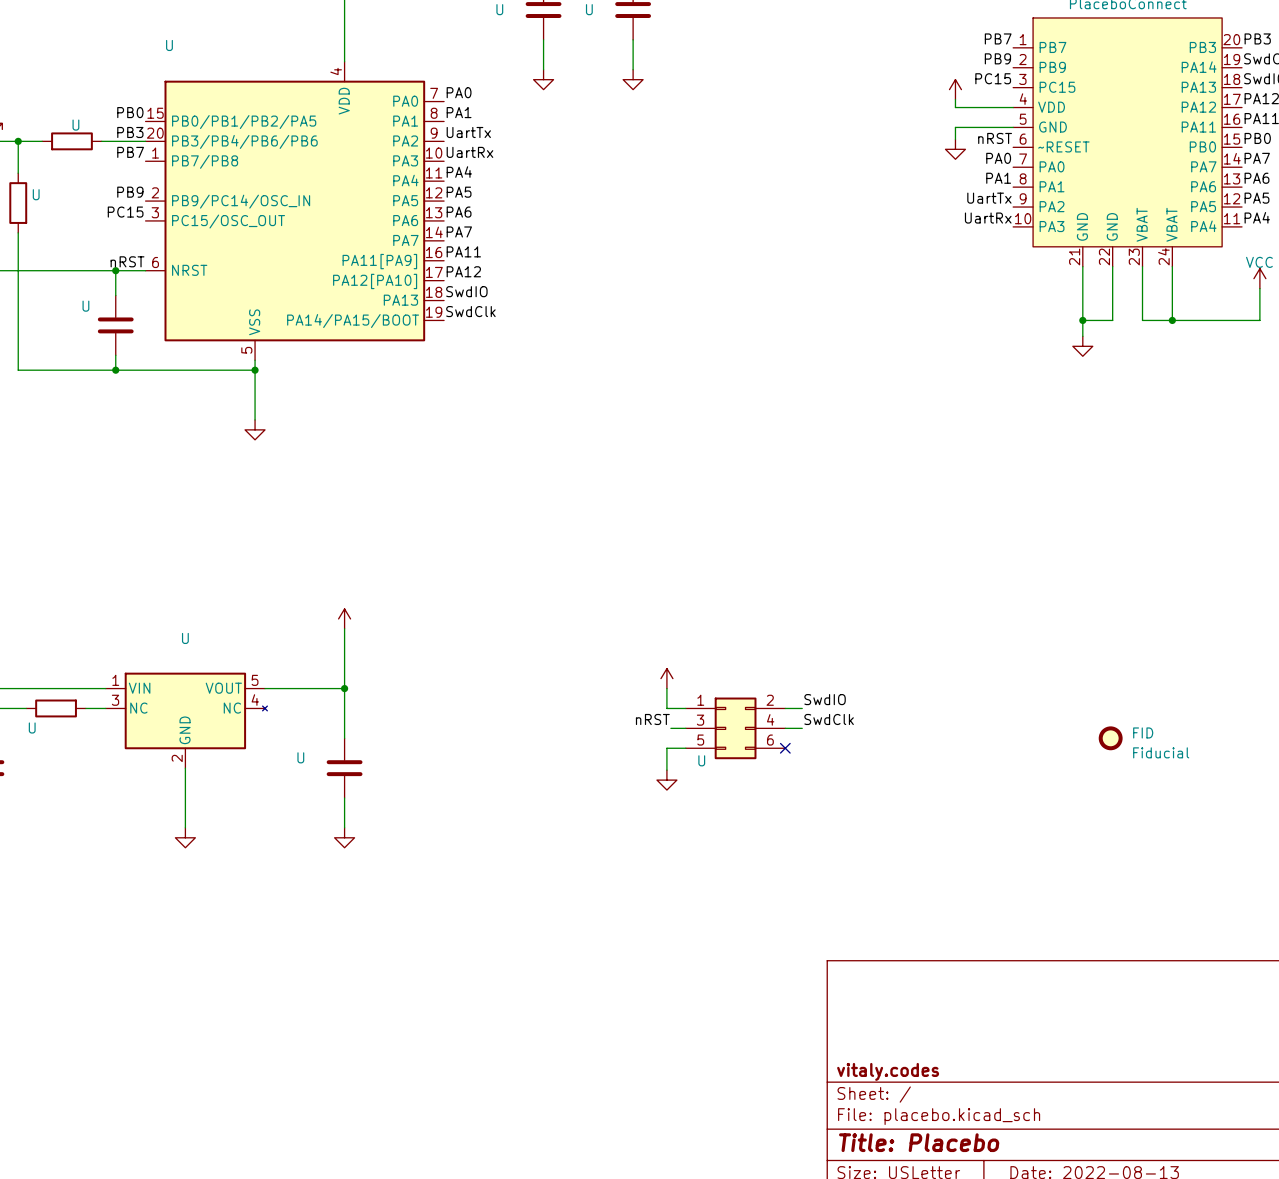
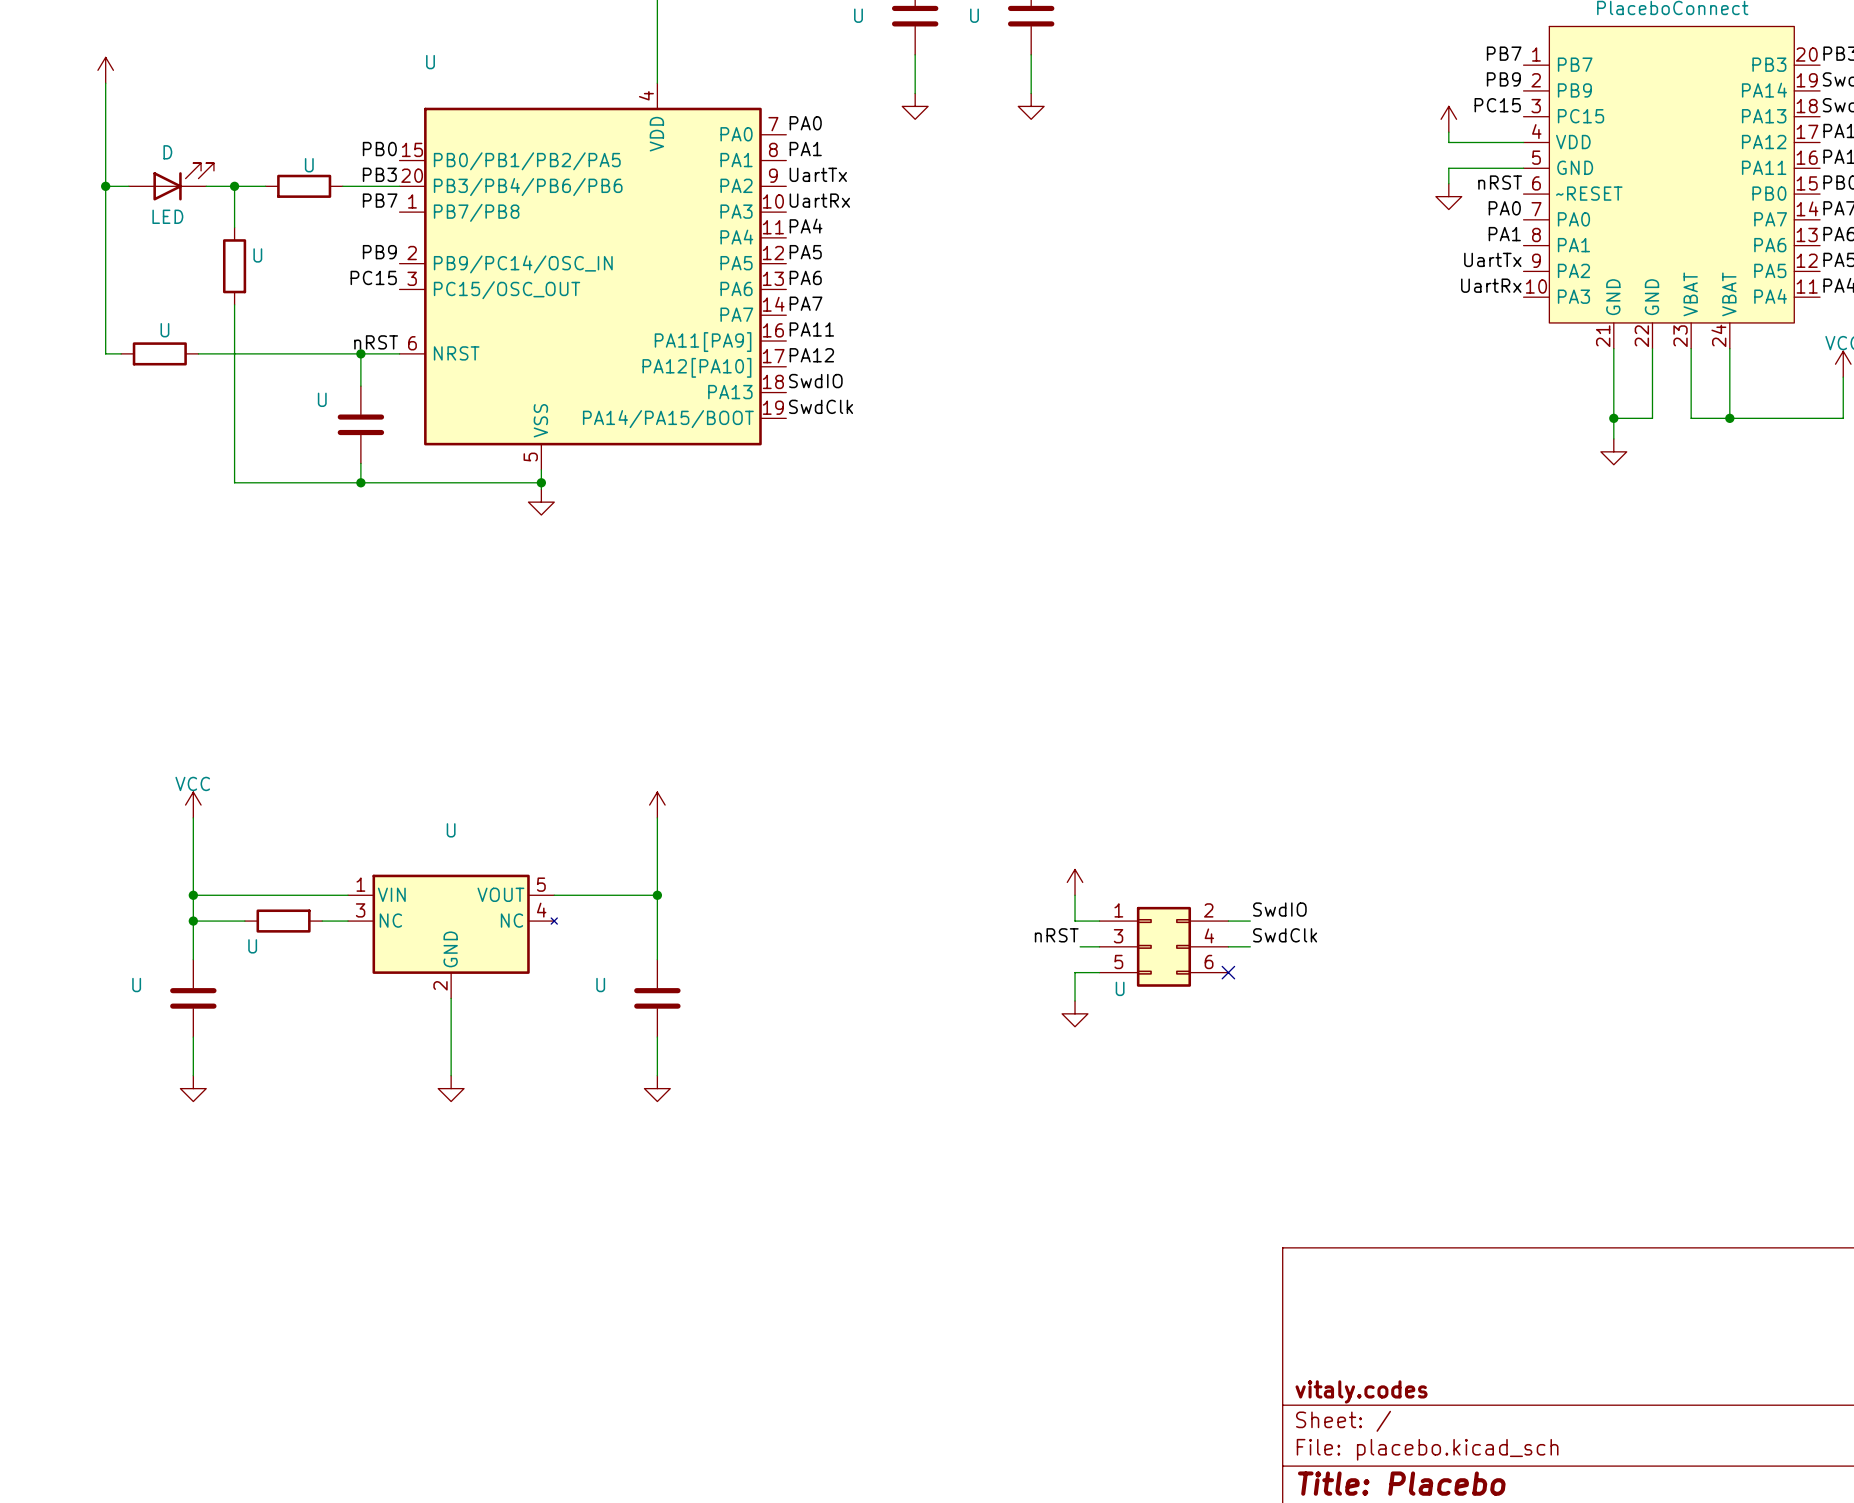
wire: (255, 375) (255, 419) -> none
power symbol position: (255, 429) -> (541, 502)
FID: Fiducial (1110, 738) -> none

